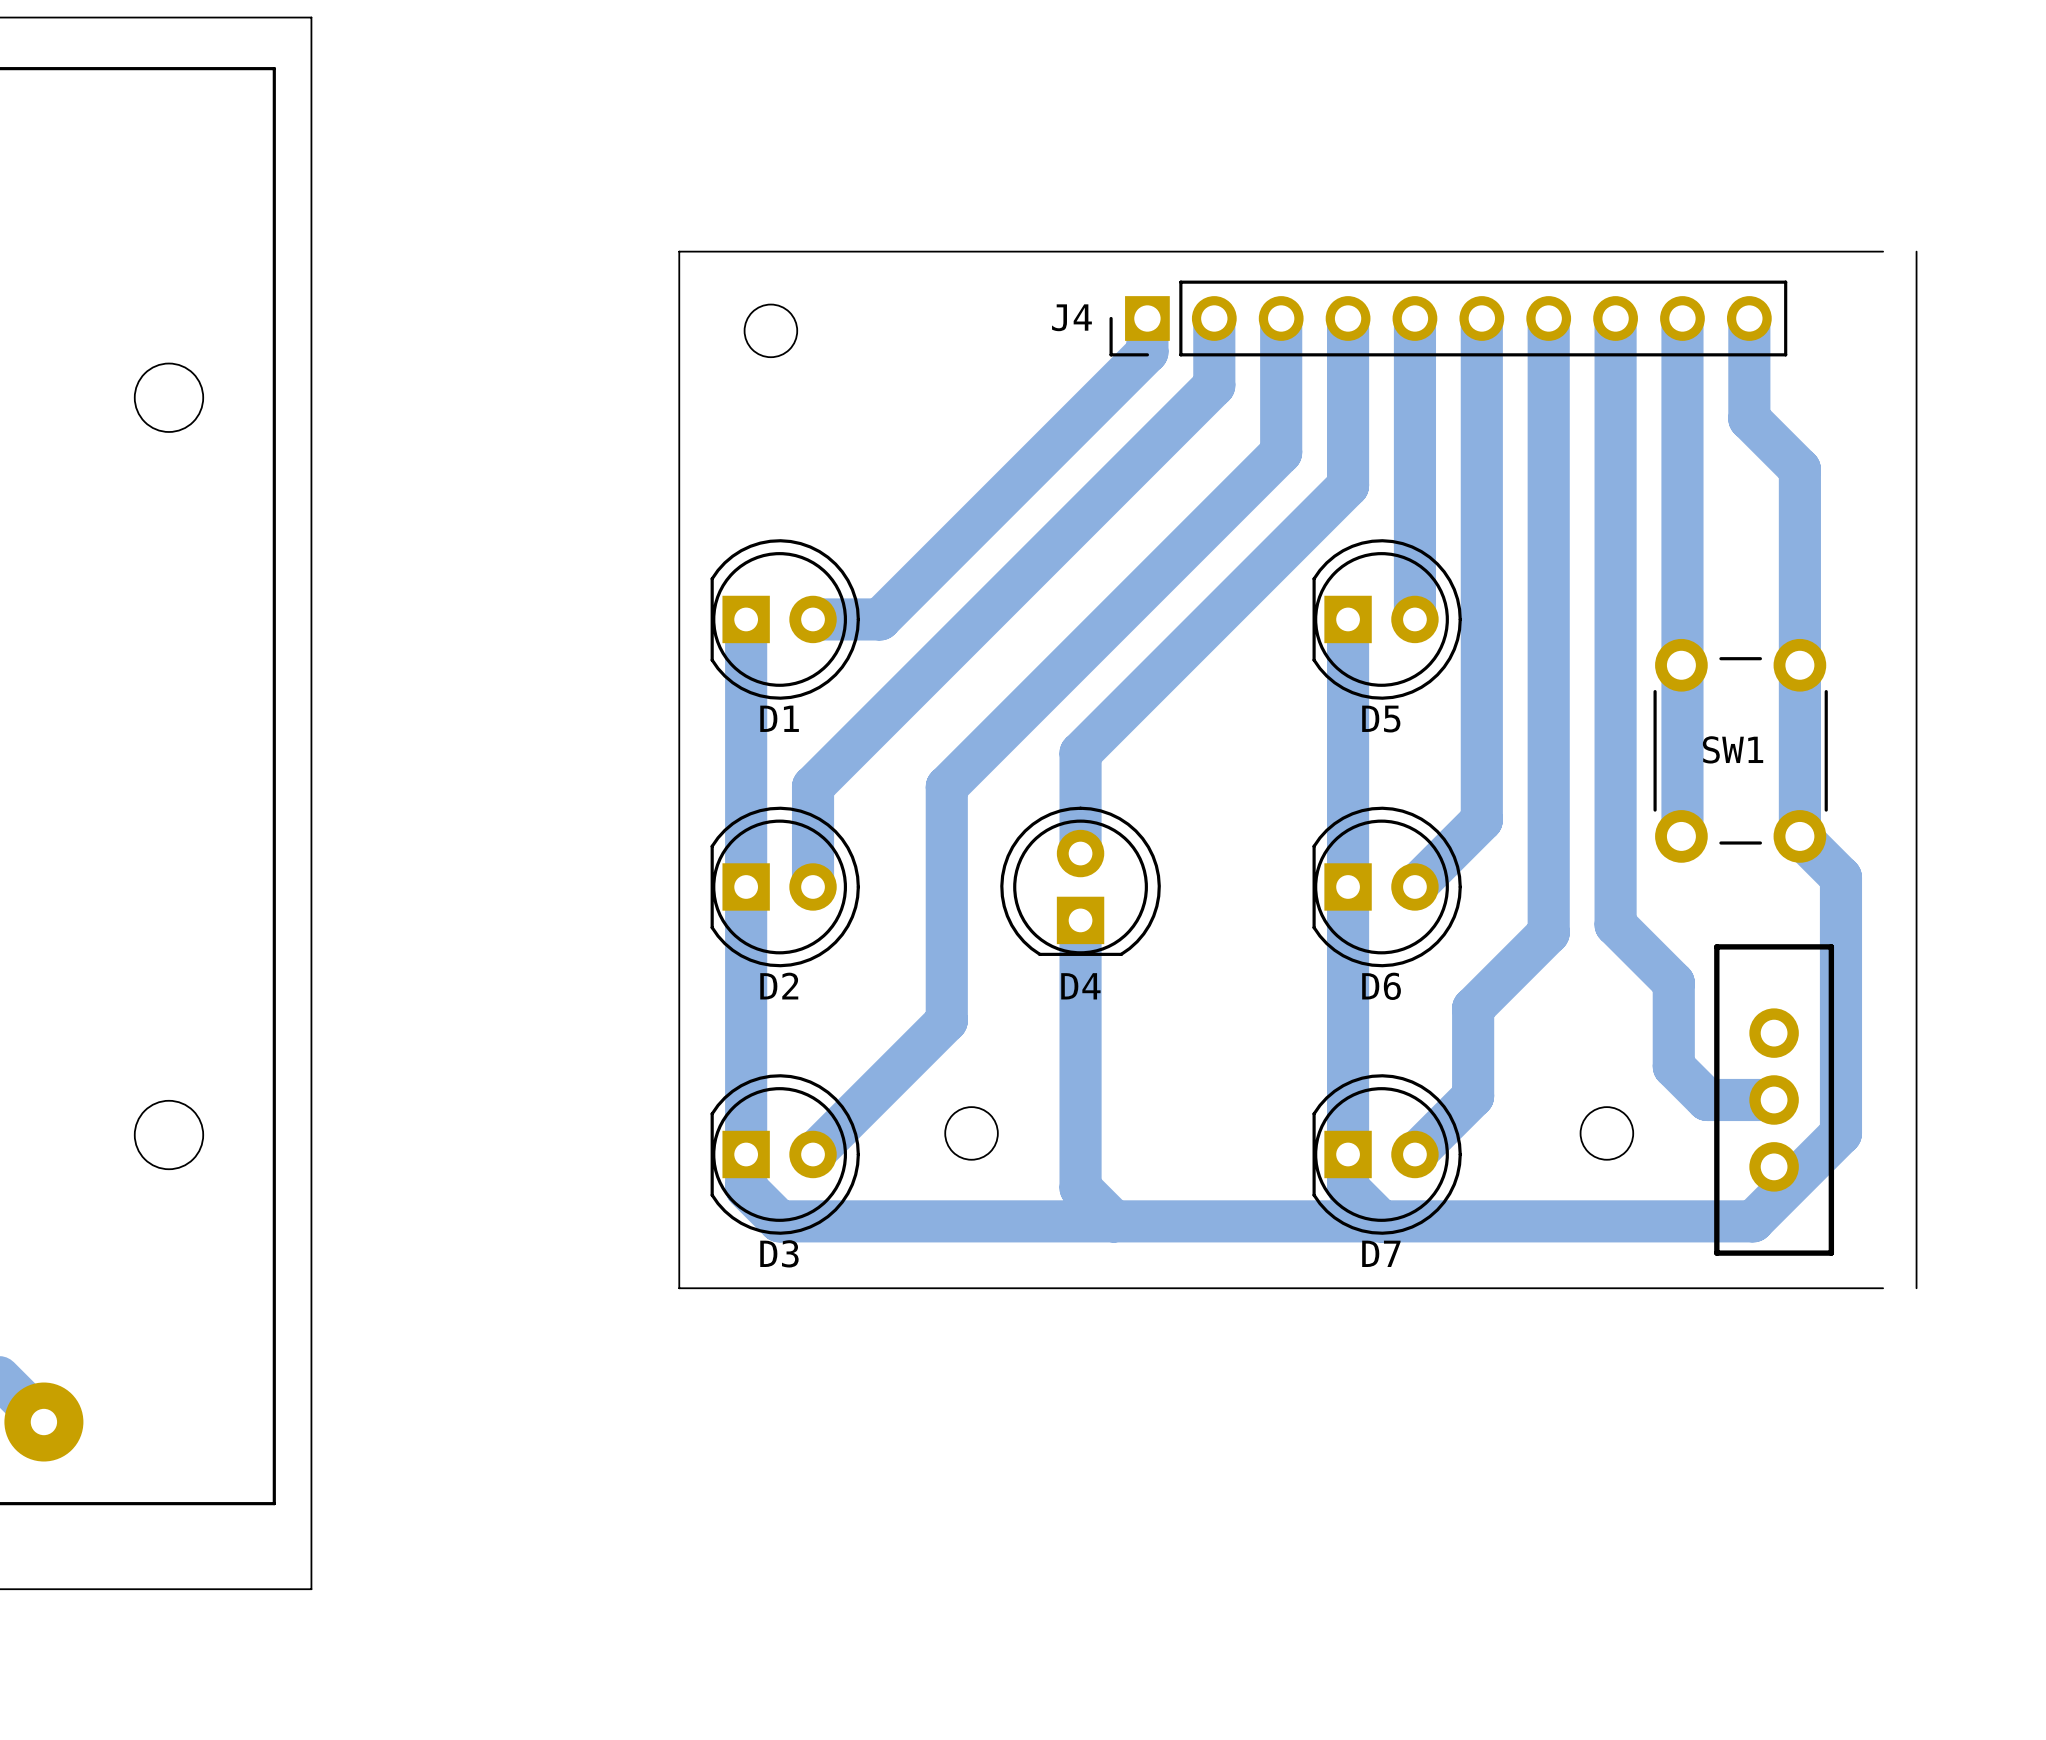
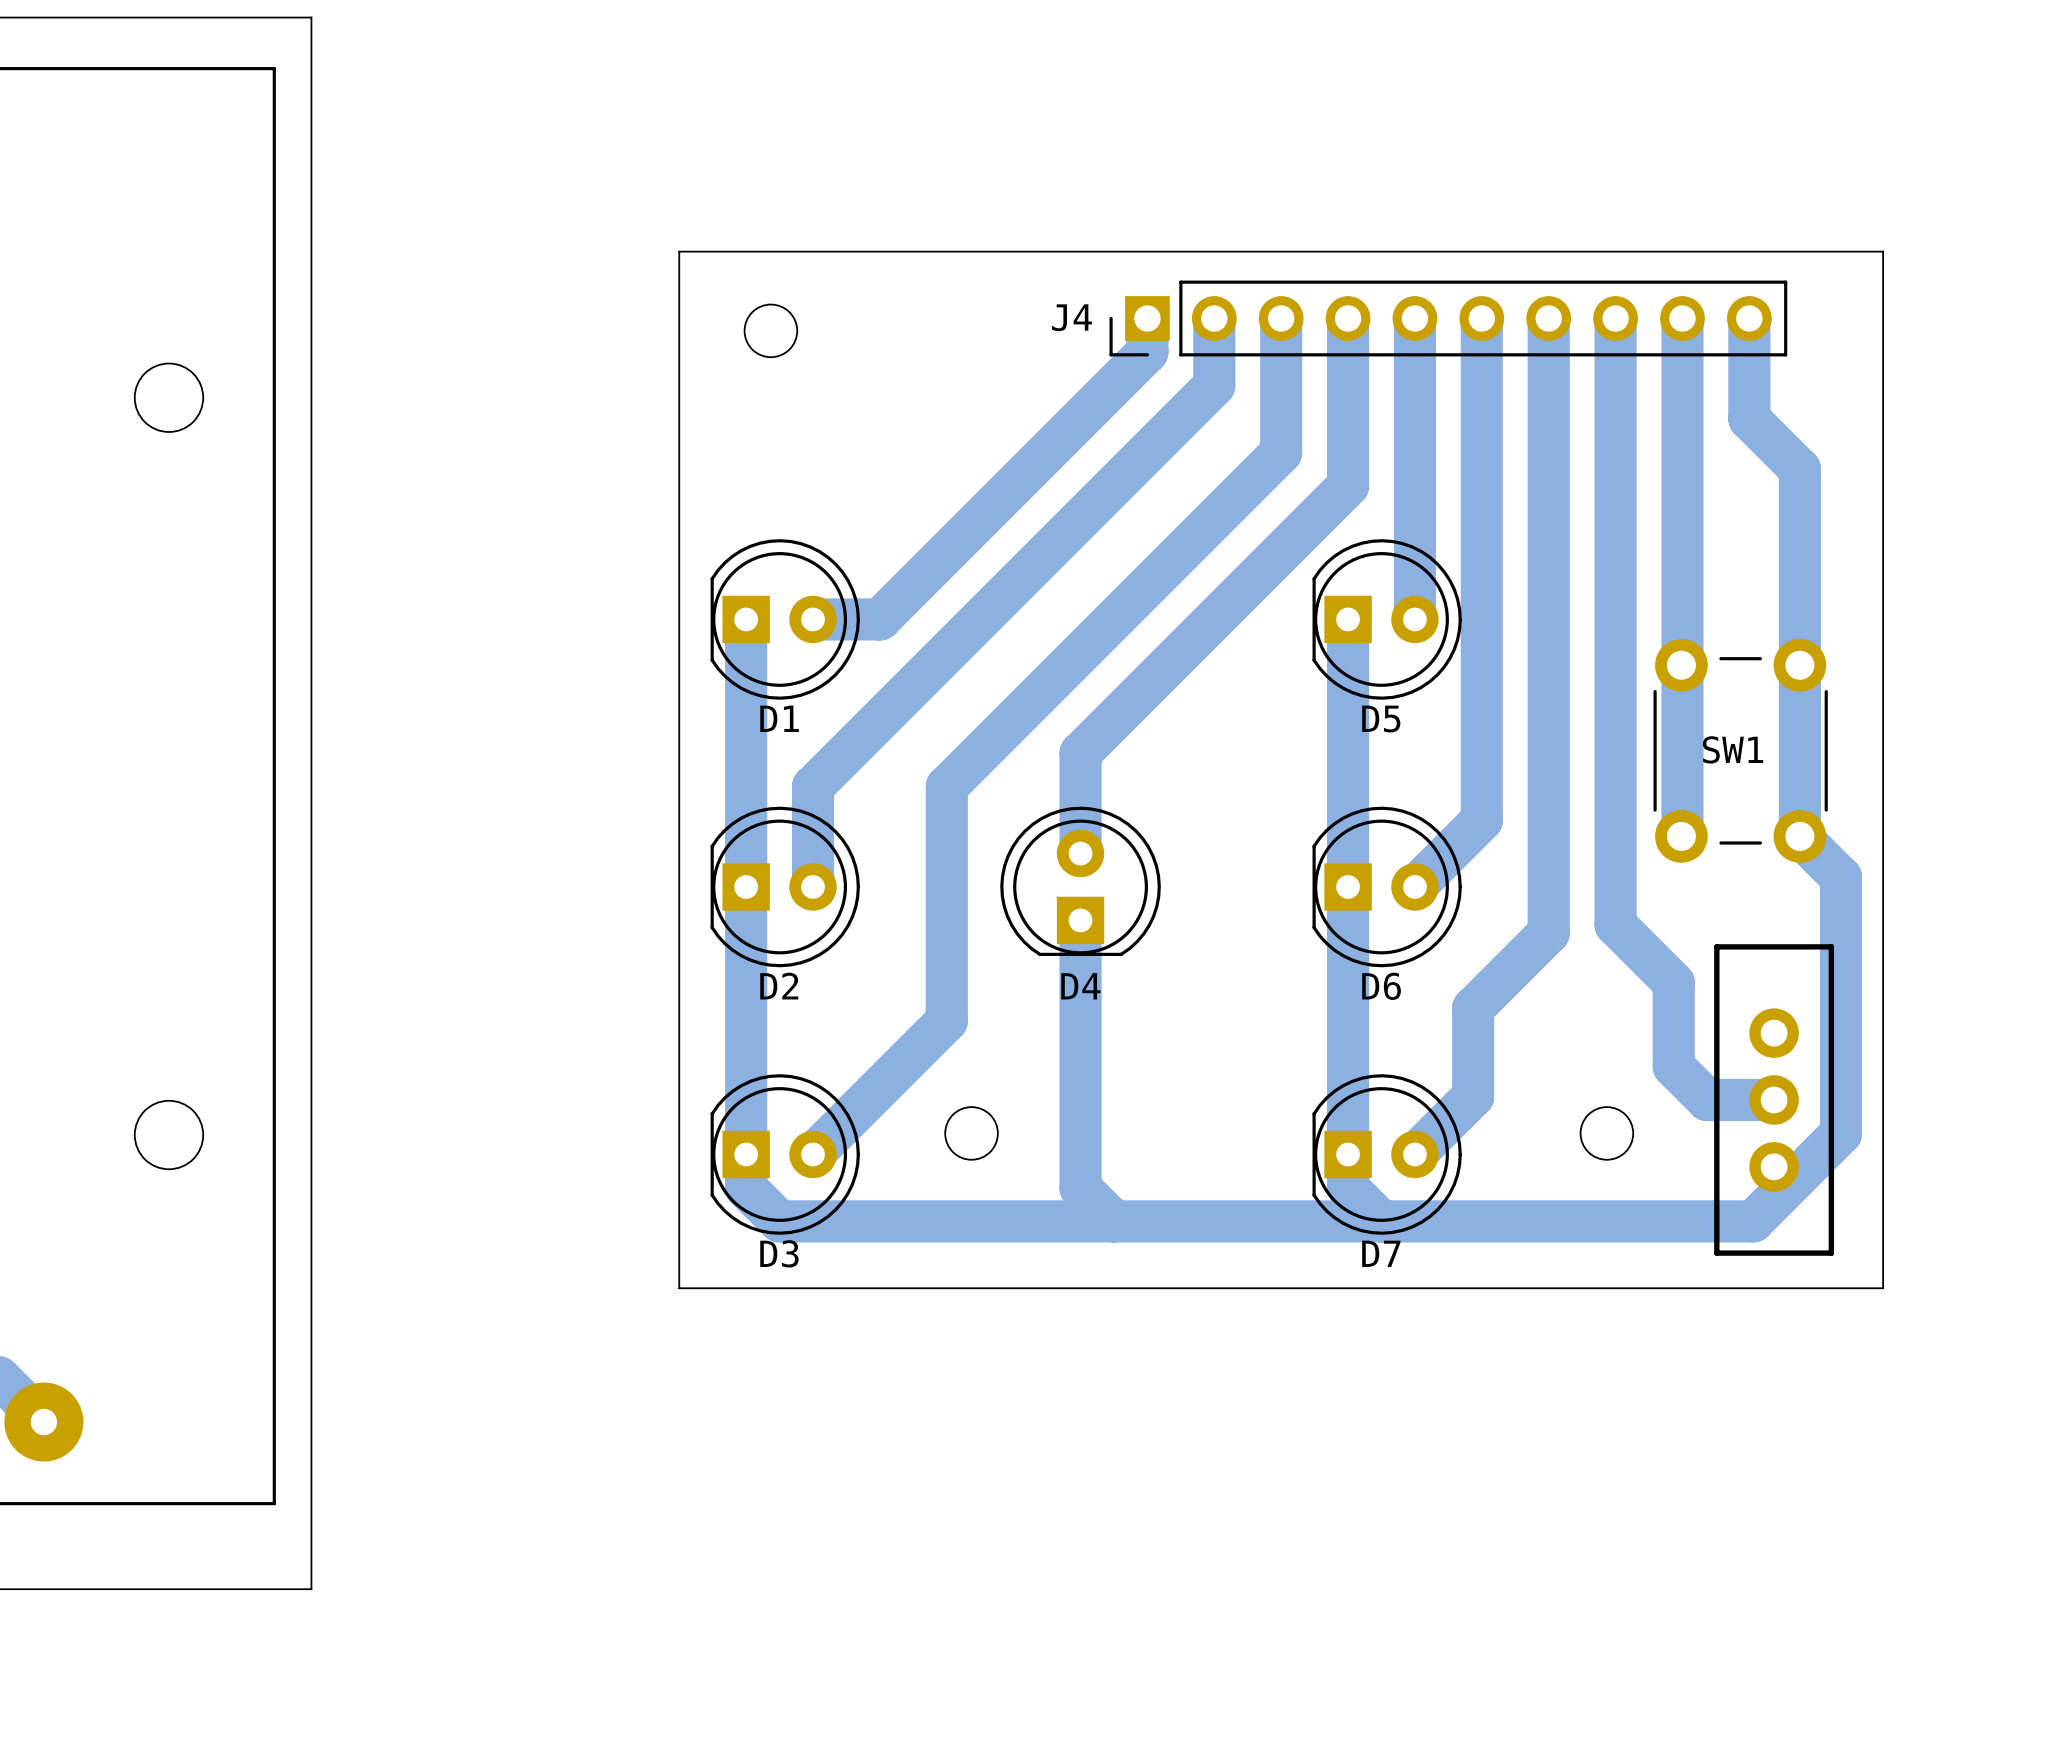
board edge: (1916, 251) (1916, 1288) -> (1883, 251) (1883, 1288)

